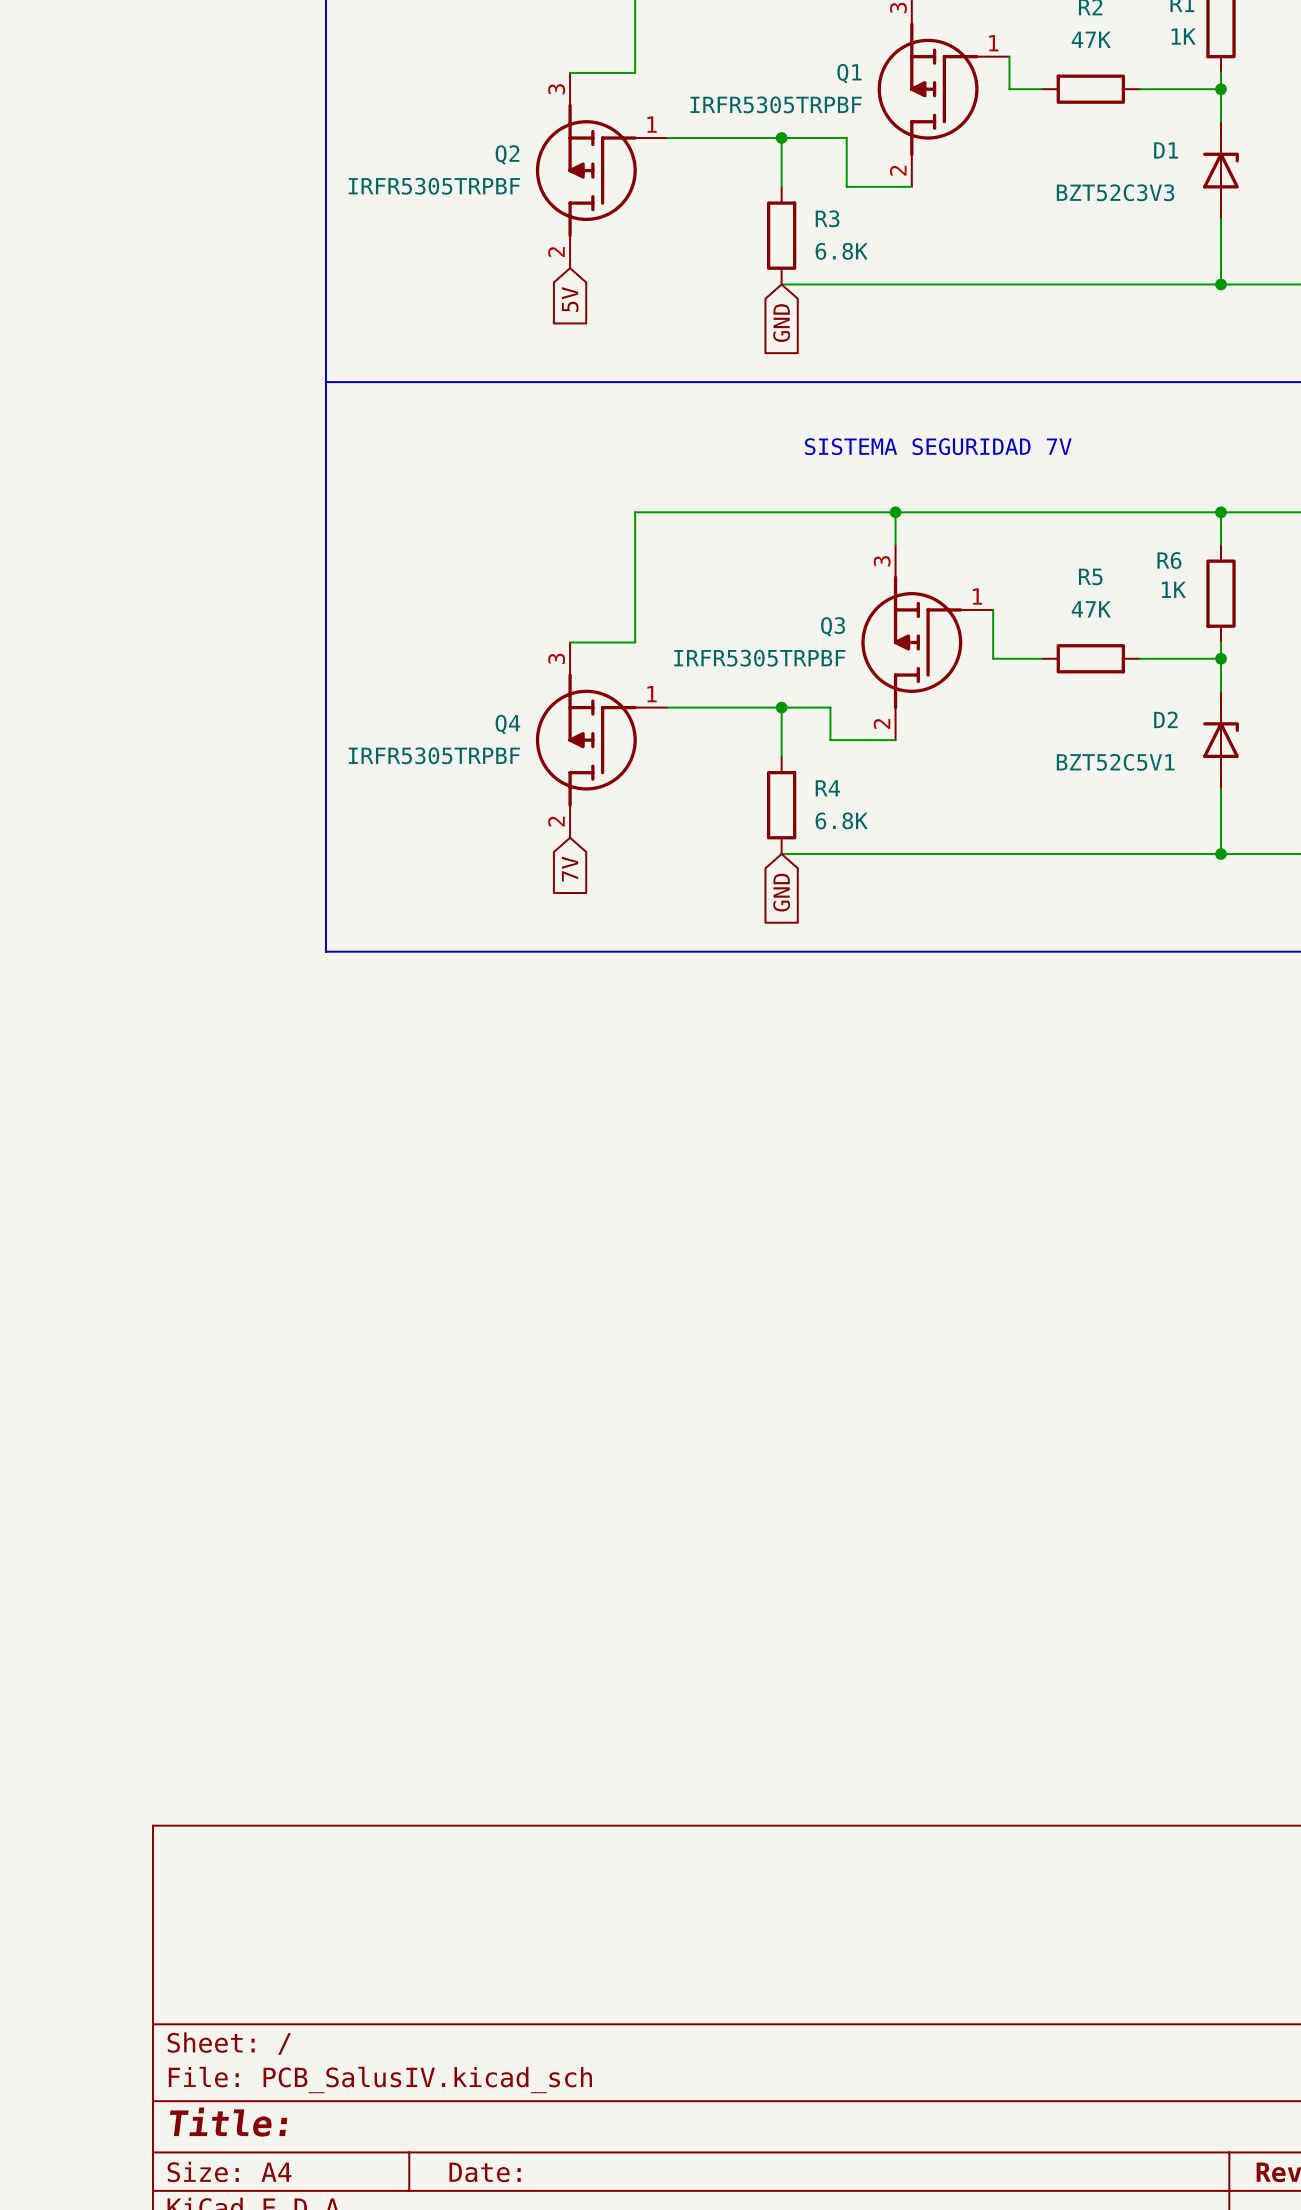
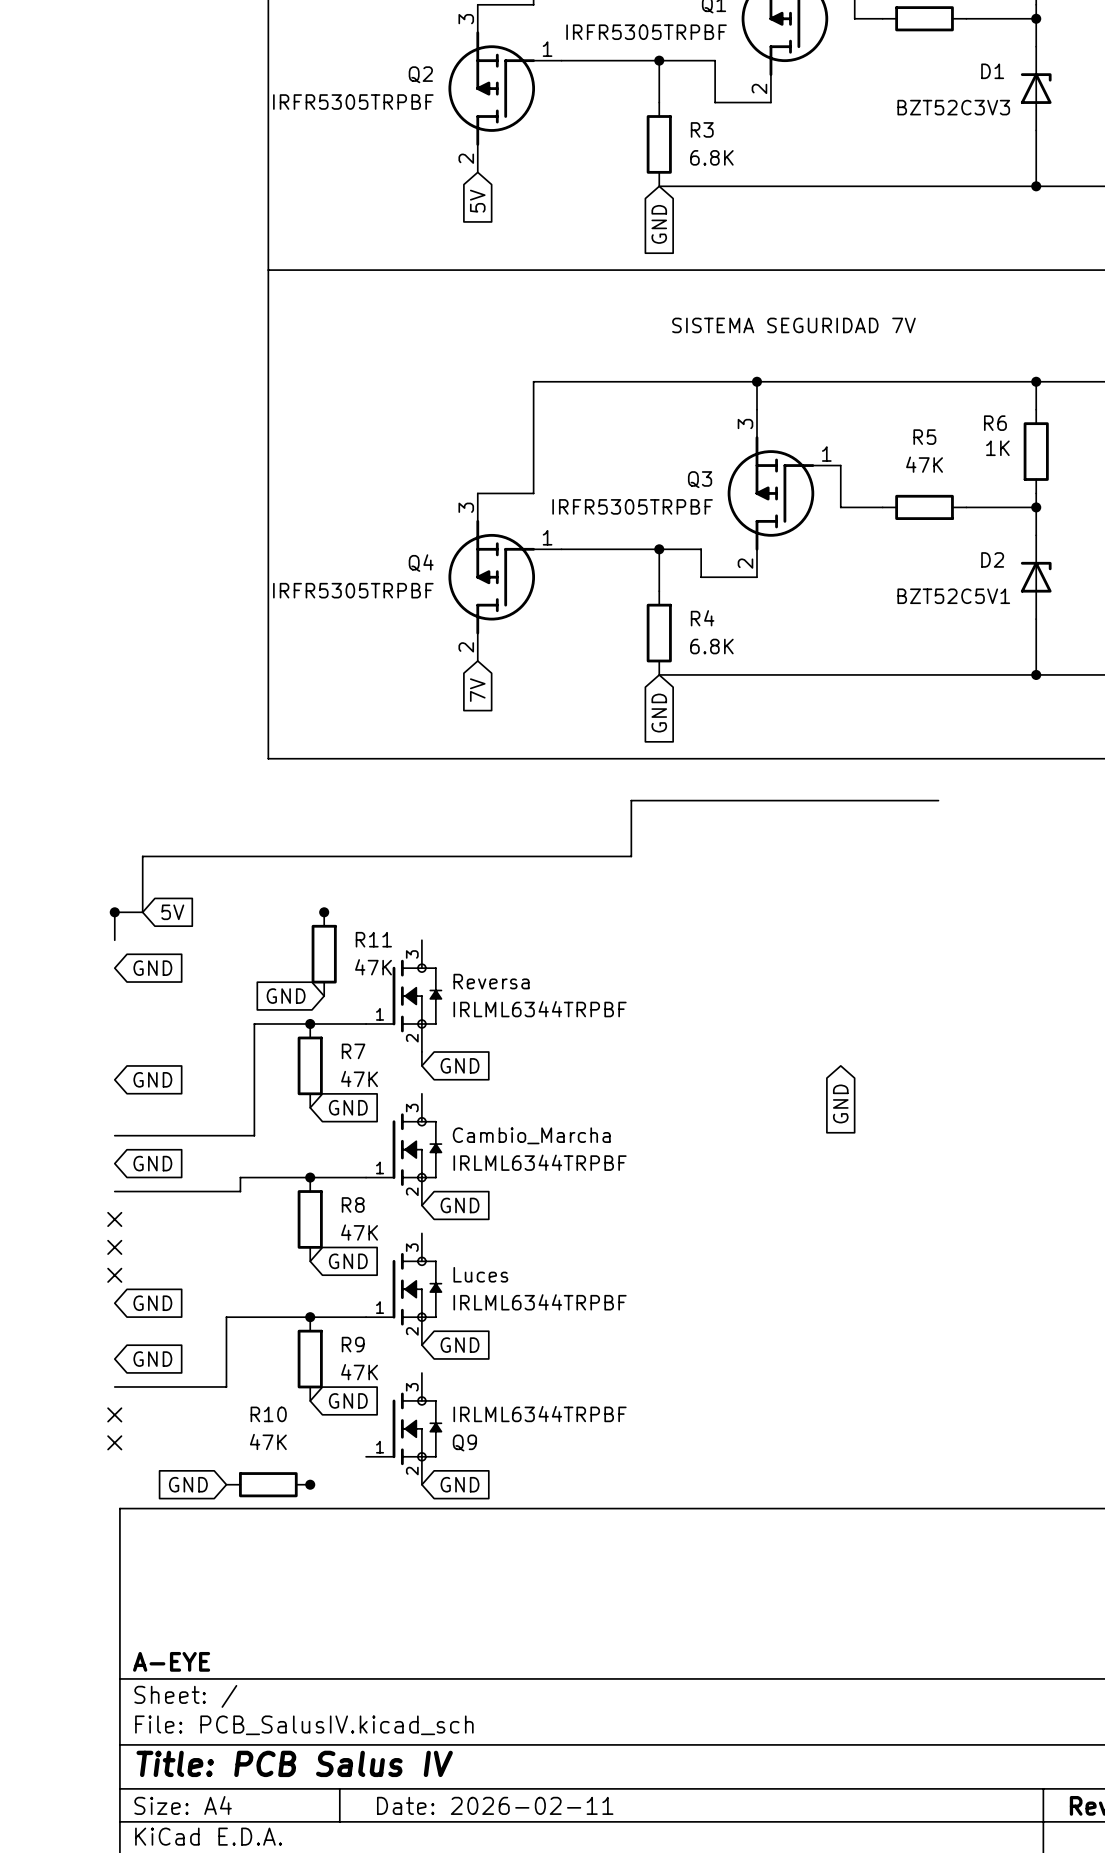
wire: none -> (938, 800) (631, 800) (631, 856) (142, 856) (142, 912) (114, 912) (114, 940)
junction: none -> (114, 912)
global label: none -> 5V (172, 912)
junction: none -> (324, 912)
R11: none -> 47K (324, 954)
global label: none -> GND (152, 968)
global label: none -> GND (286, 996)
Reversa: none -> IRLML6344TRPBF (404, 996)
junction: none -> (310, 1023)
wire: none -> (366, 1023) (254, 1023) (254, 1135) (114, 1135)
wire: none -> (421, 1051) (421, 1065)
R7: none -> 47K (310, 1065)
global label: none -> GND (460, 1065)
global label: none -> GND (152, 1079)
global label: none -> GND (840, 1103)
global label: none -> GND (348, 1107)
Cambio_Marcha: none -> IRLML6344TRPBF (404, 1149)
global label: none -> GND (152, 1163)
junction: none -> (310, 1177)
wire: none -> (366, 1177) (240, 1177) (240, 1191) (114, 1191)
global label: none -> GND (460, 1205)
no-connect mark: none -> (114, 1219)
R8: none -> 47K (310, 1219)
no-connect mark: none -> (114, 1247)
global label: none -> GND (348, 1261)
no-connect mark: none -> (114, 1275)
Luces: none -> IRLML6344TRPBF (404, 1289)
global label: none -> GND (152, 1303)
junction: none -> (310, 1317)
wire: none -> (366, 1317) (226, 1317) (226, 1386) (114, 1386)
global label: none -> GND (460, 1345)
global label: none -> GND (152, 1359)
R9: none -> 47K (310, 1359)
global label: none -> GND (348, 1400)
no-connect mark: none -> (114, 1414)
Q9: none -> IRLML6344TRPBF (404, 1428)
no-connect mark: none -> (114, 1442)
global label: none -> GND (188, 1484)
R10: none -> 47K (268, 1484)
junction: none -> (310, 1484)
global label: none -> GND (460, 1484)
title block: none -> A-EYE (171, 1661)
title block: Title: (228, 2122) -> Title: PCB Salus IV (294, 1763)
title block: Date: (485, 2172) -> Date: 2026-02-11 (495, 1805)

